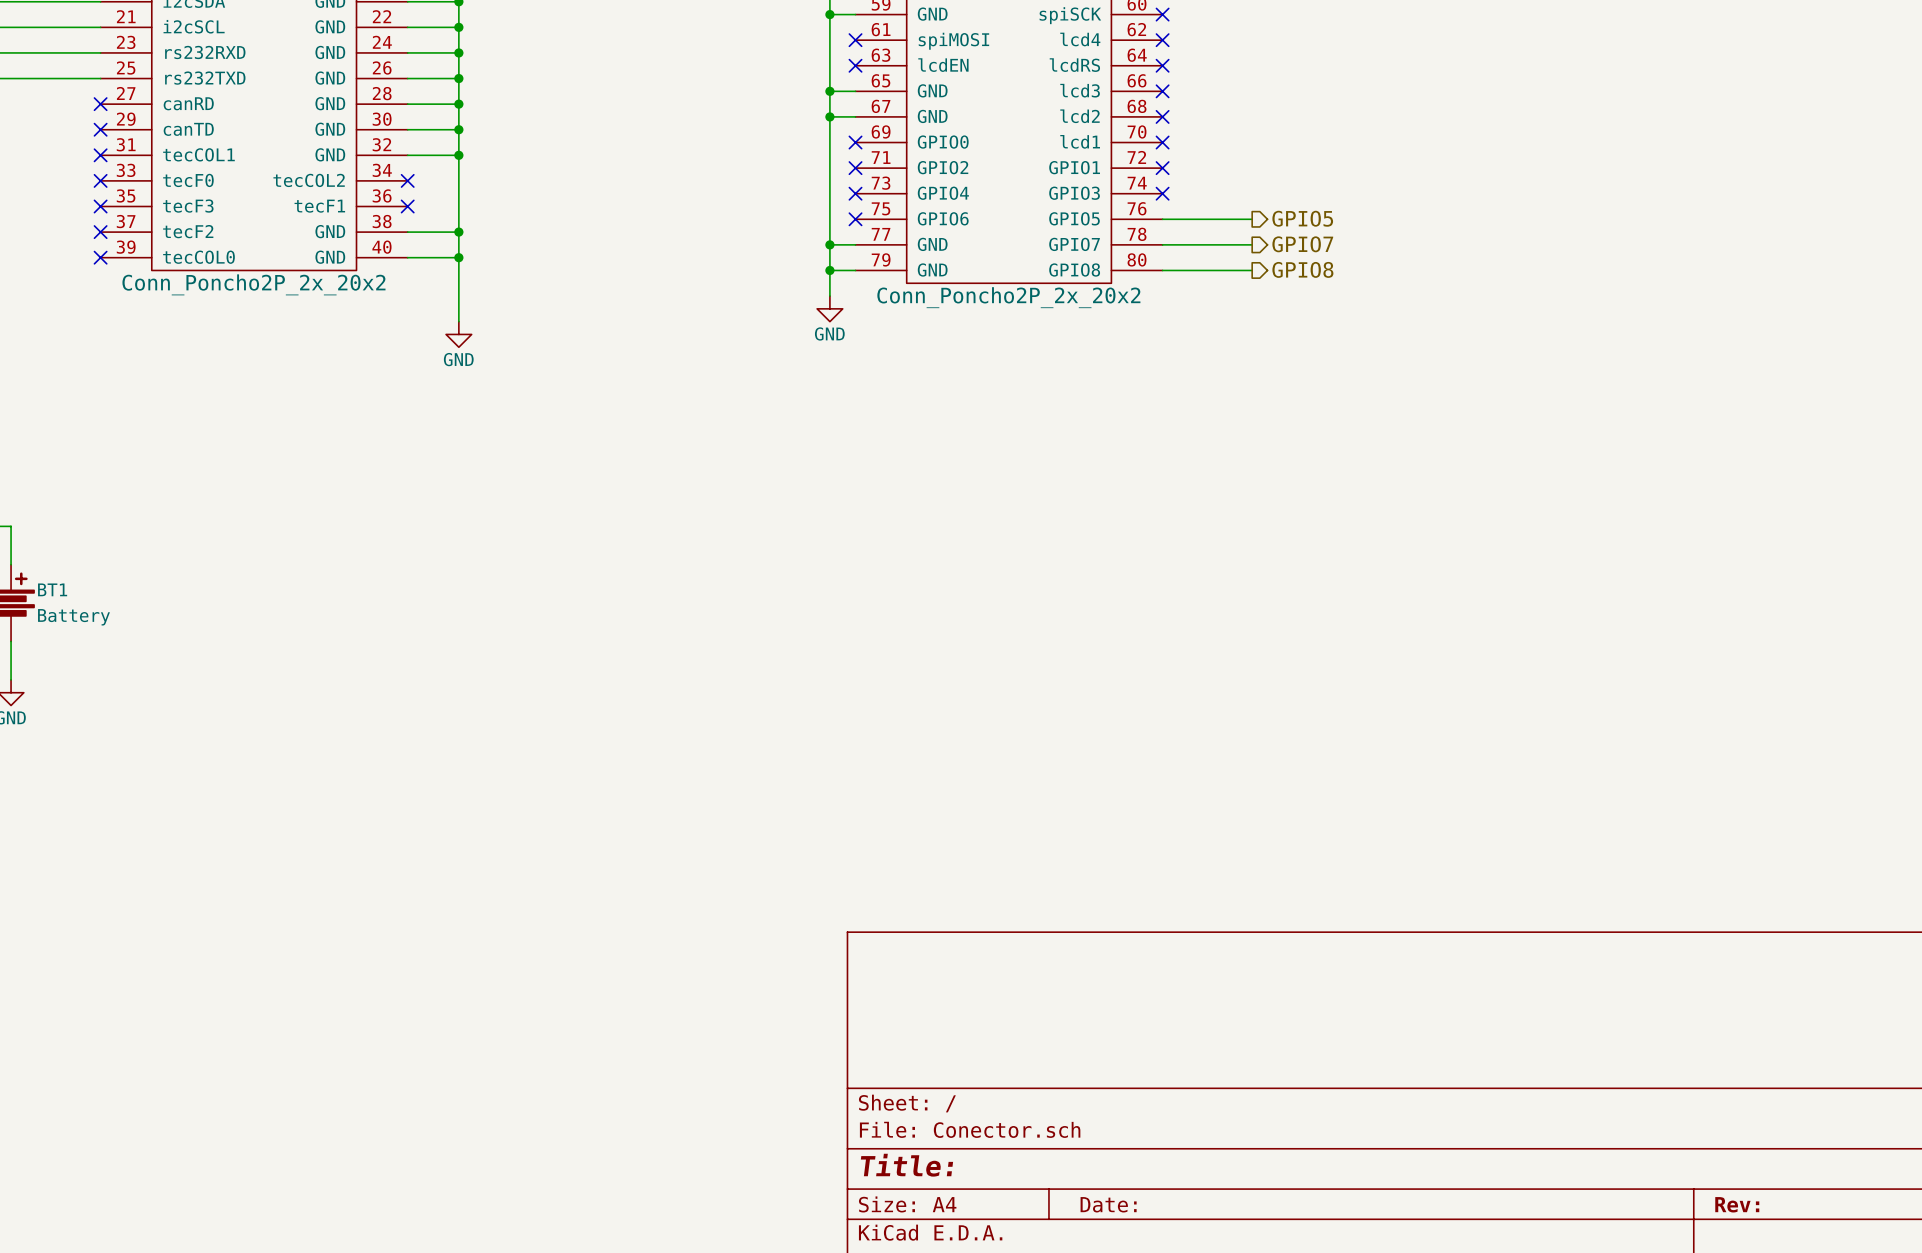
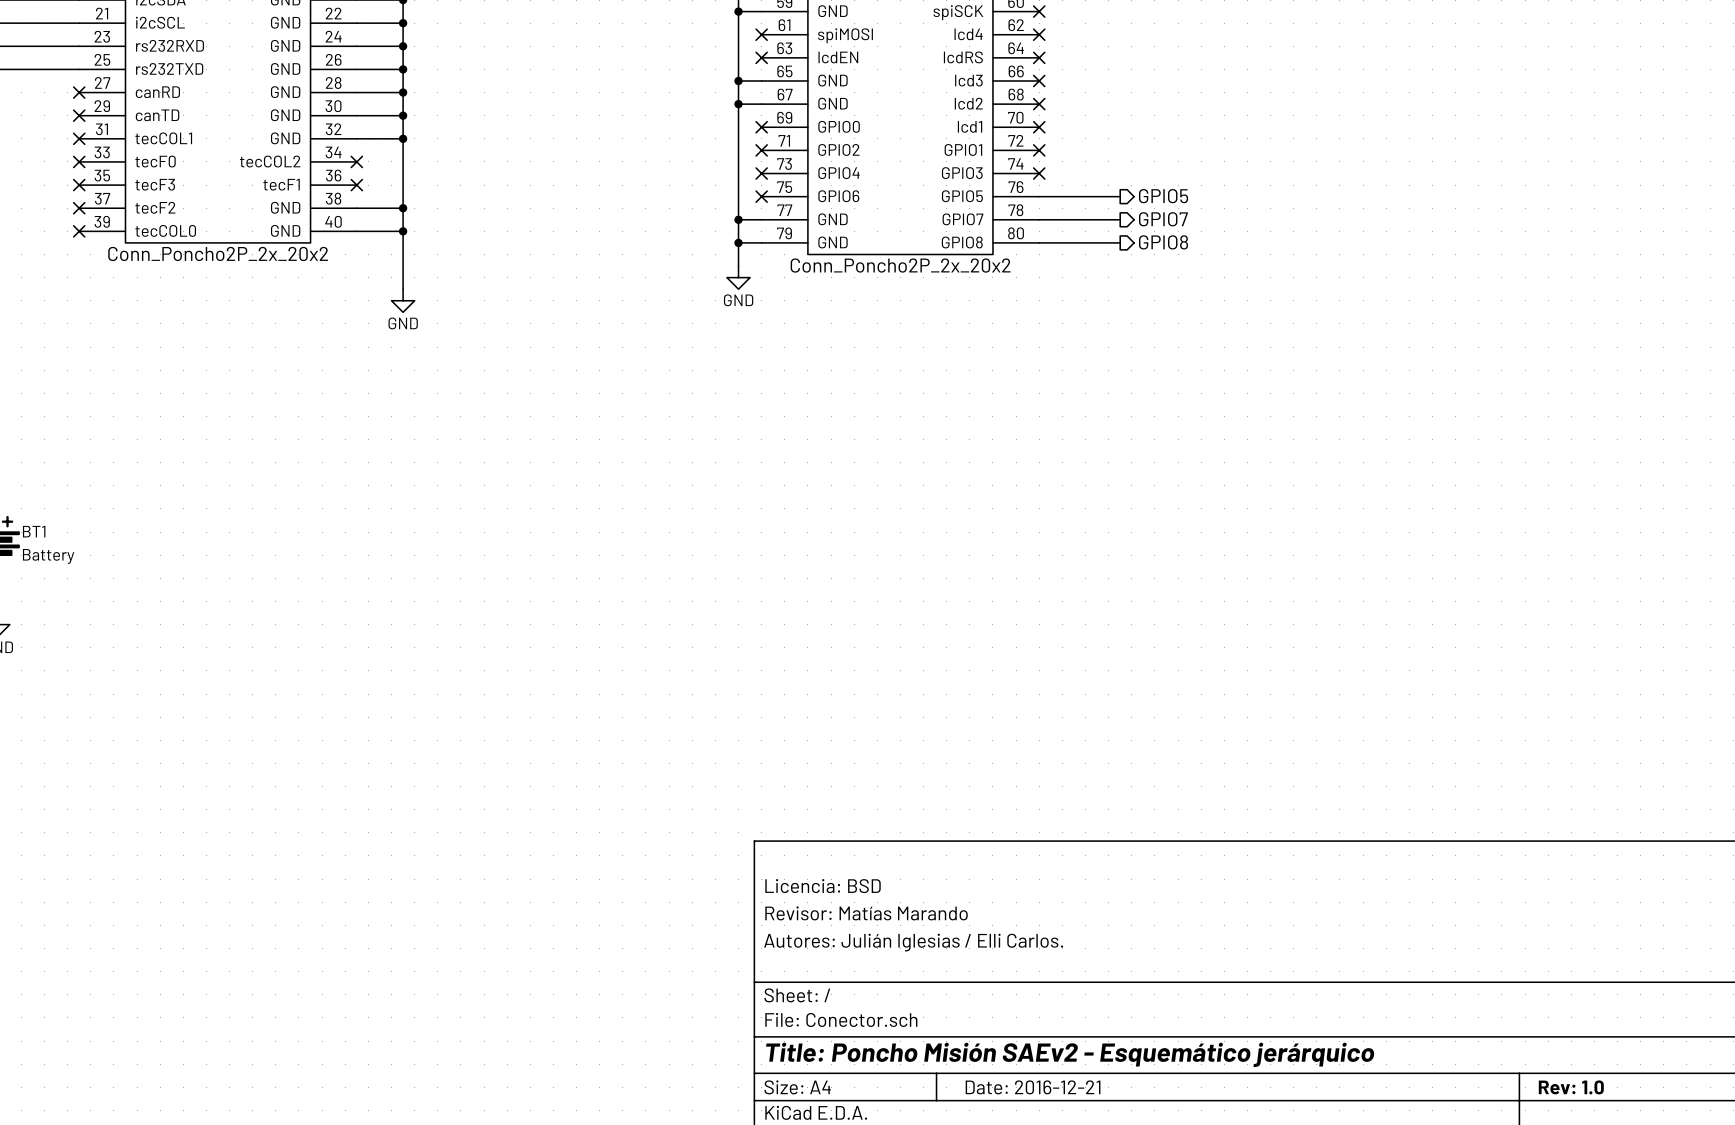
title block: none -> Licencia: BSD (823, 886)
title block: none -> Revisor: Matías Marando (866, 913)
title block: none -> Autores: Julián Iglesias / Elli Carlos. (913, 942)
title block: Title: (906, 1165) -> Title: Poncho Misión SAEv2 - Esquemático jerárquico (1070, 1054)
title block: Date: (1108, 1204) -> Date: 2016-12-21 (1033, 1087)
title block: Rev: (1737, 1204) -> Rev: 1.0 (1571, 1087)

